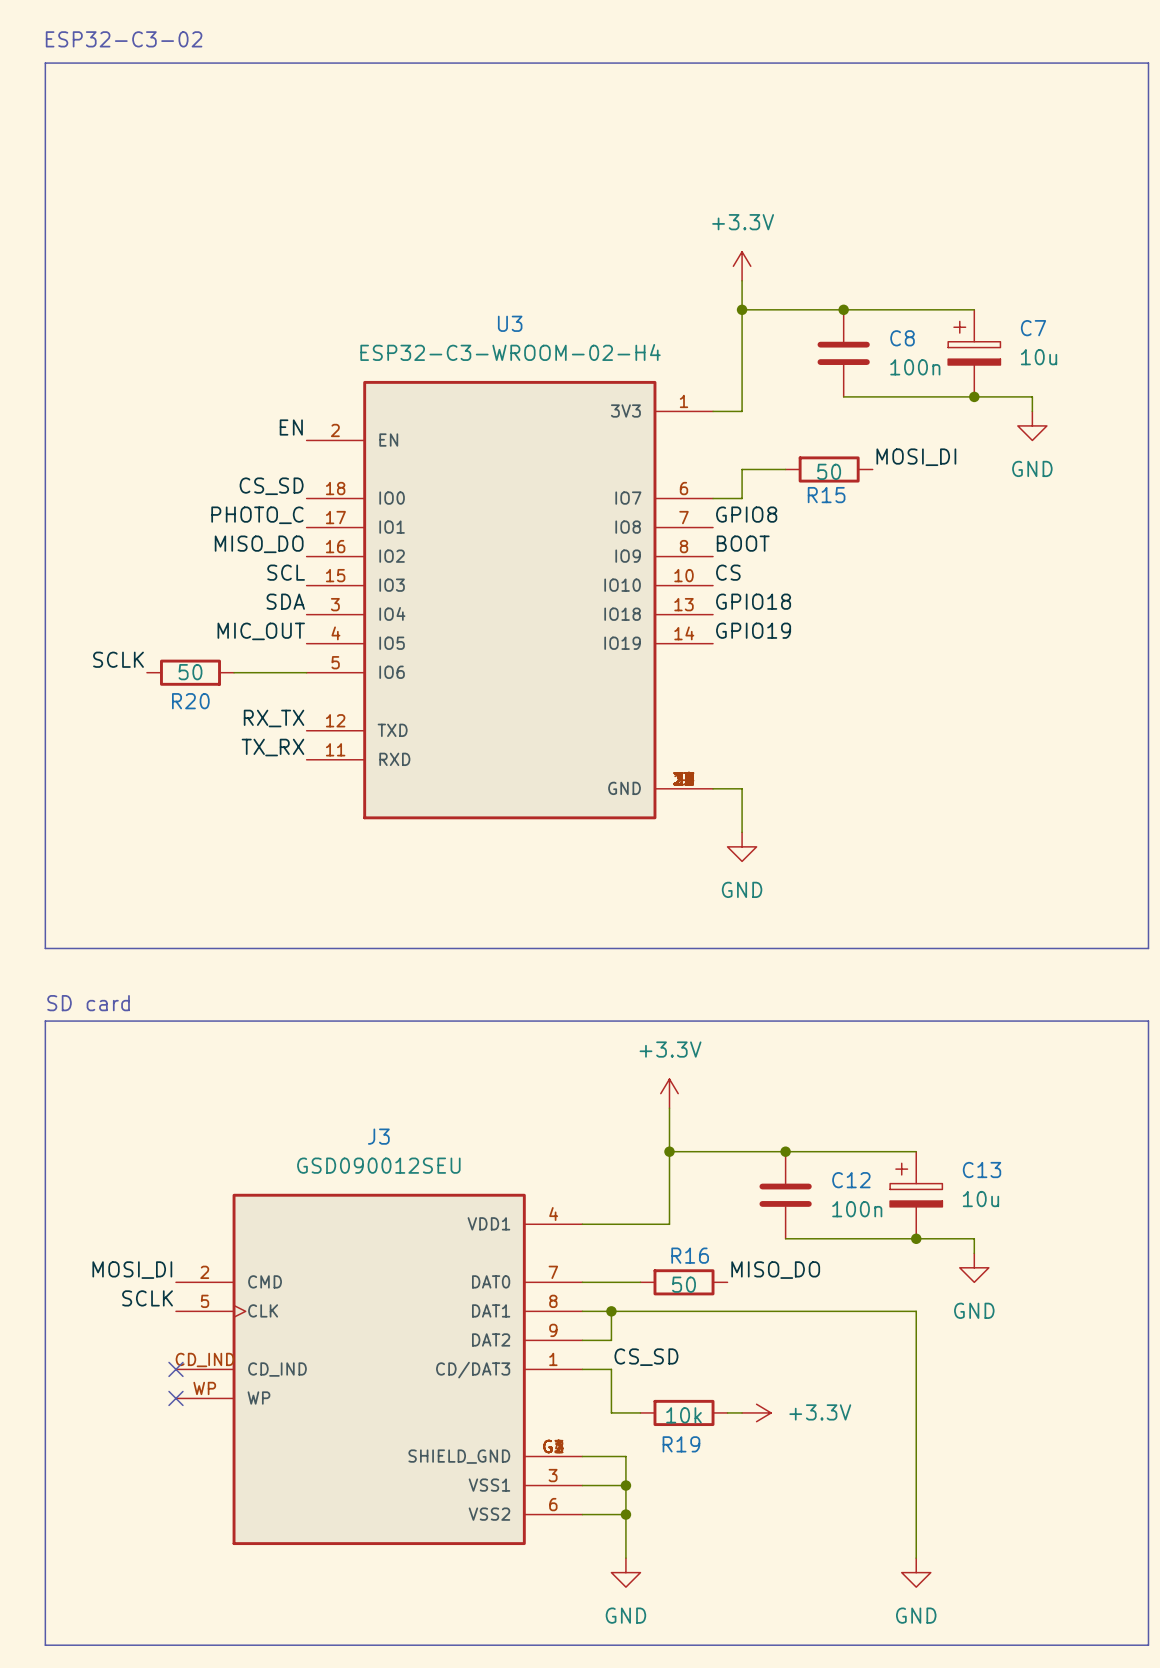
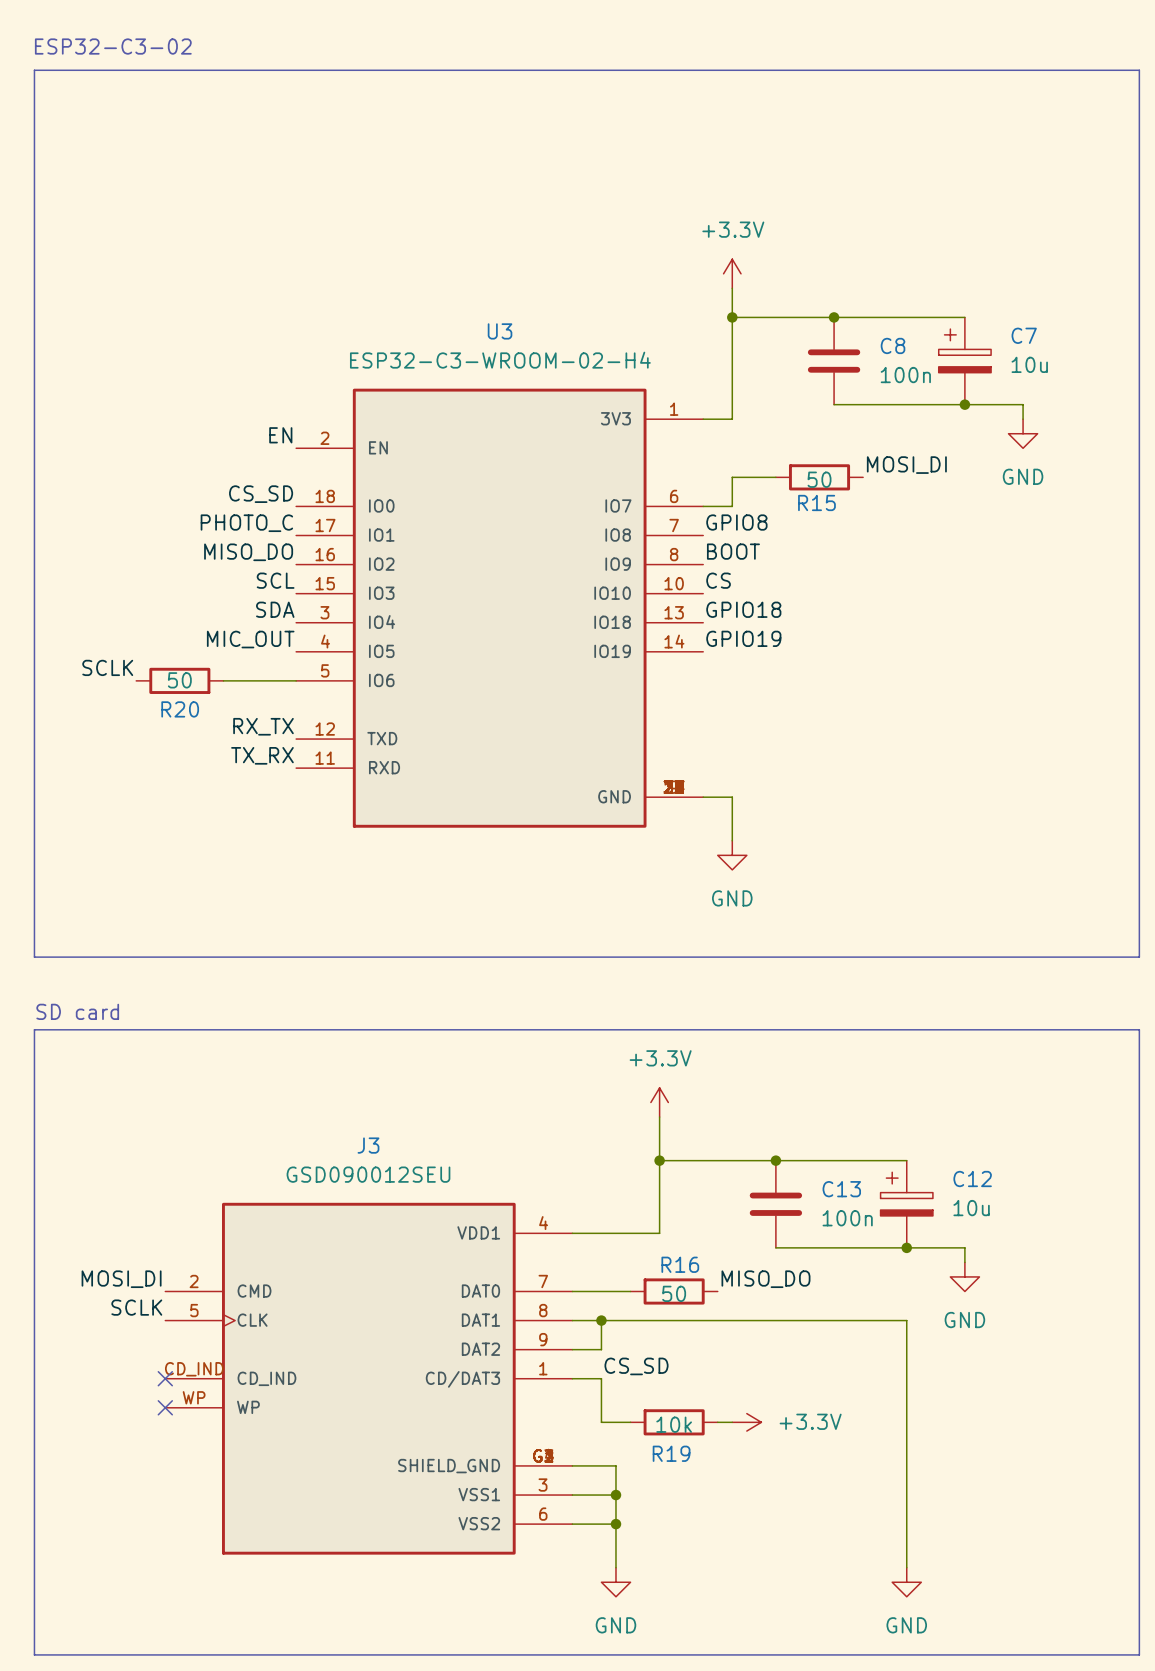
C13 name: C13 (982, 1170) -> C12 (972, 1179)
C12 name: C12 (851, 1180) -> C13 (841, 1189)

